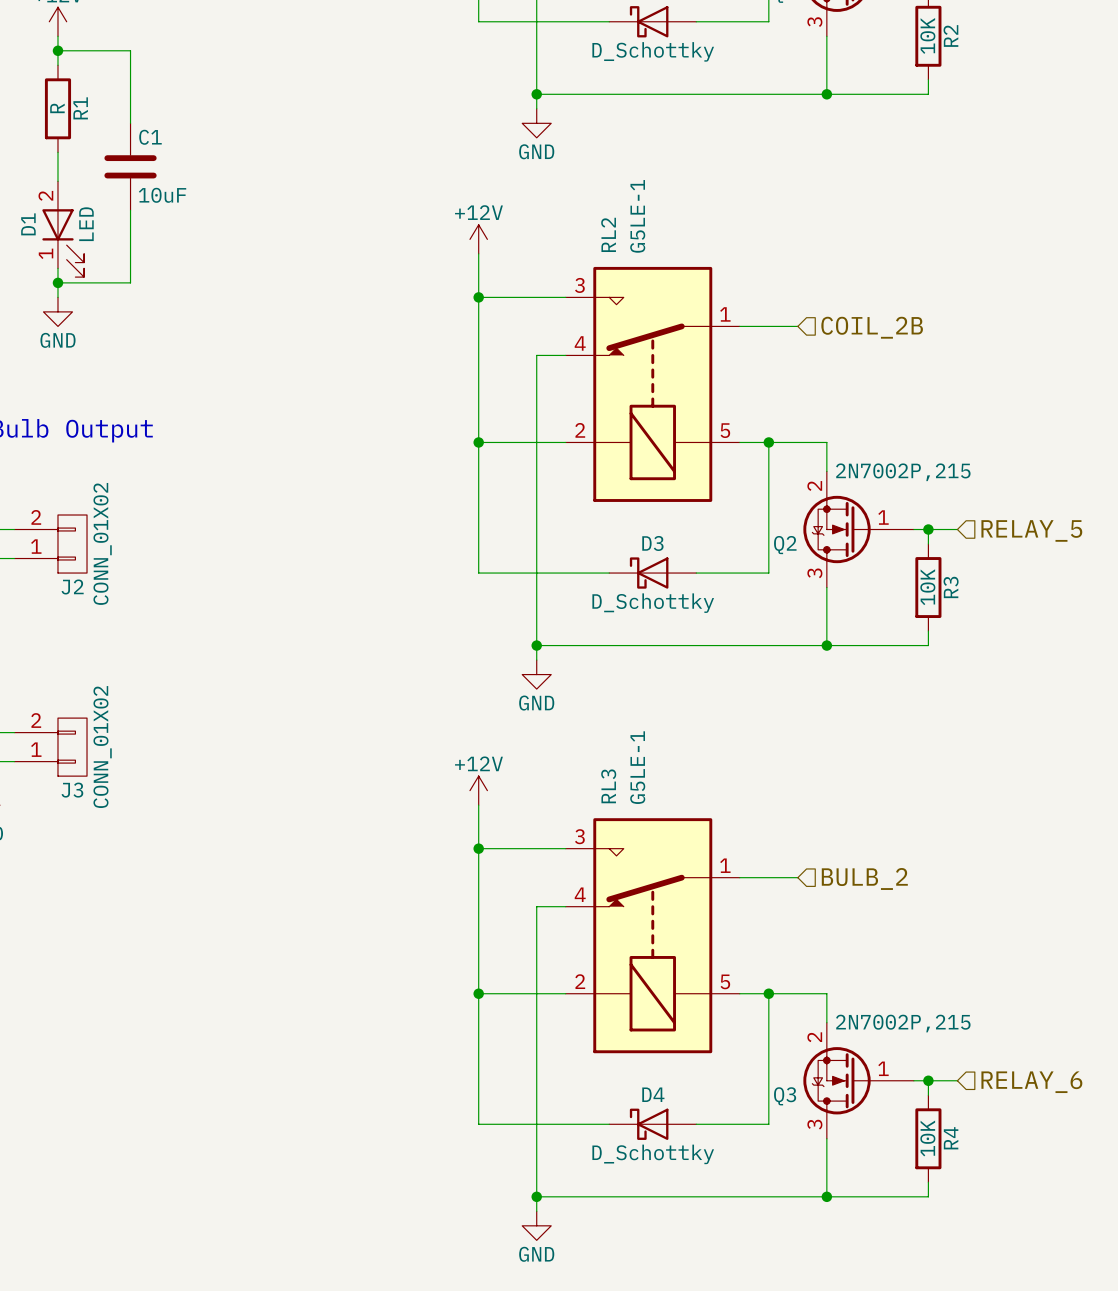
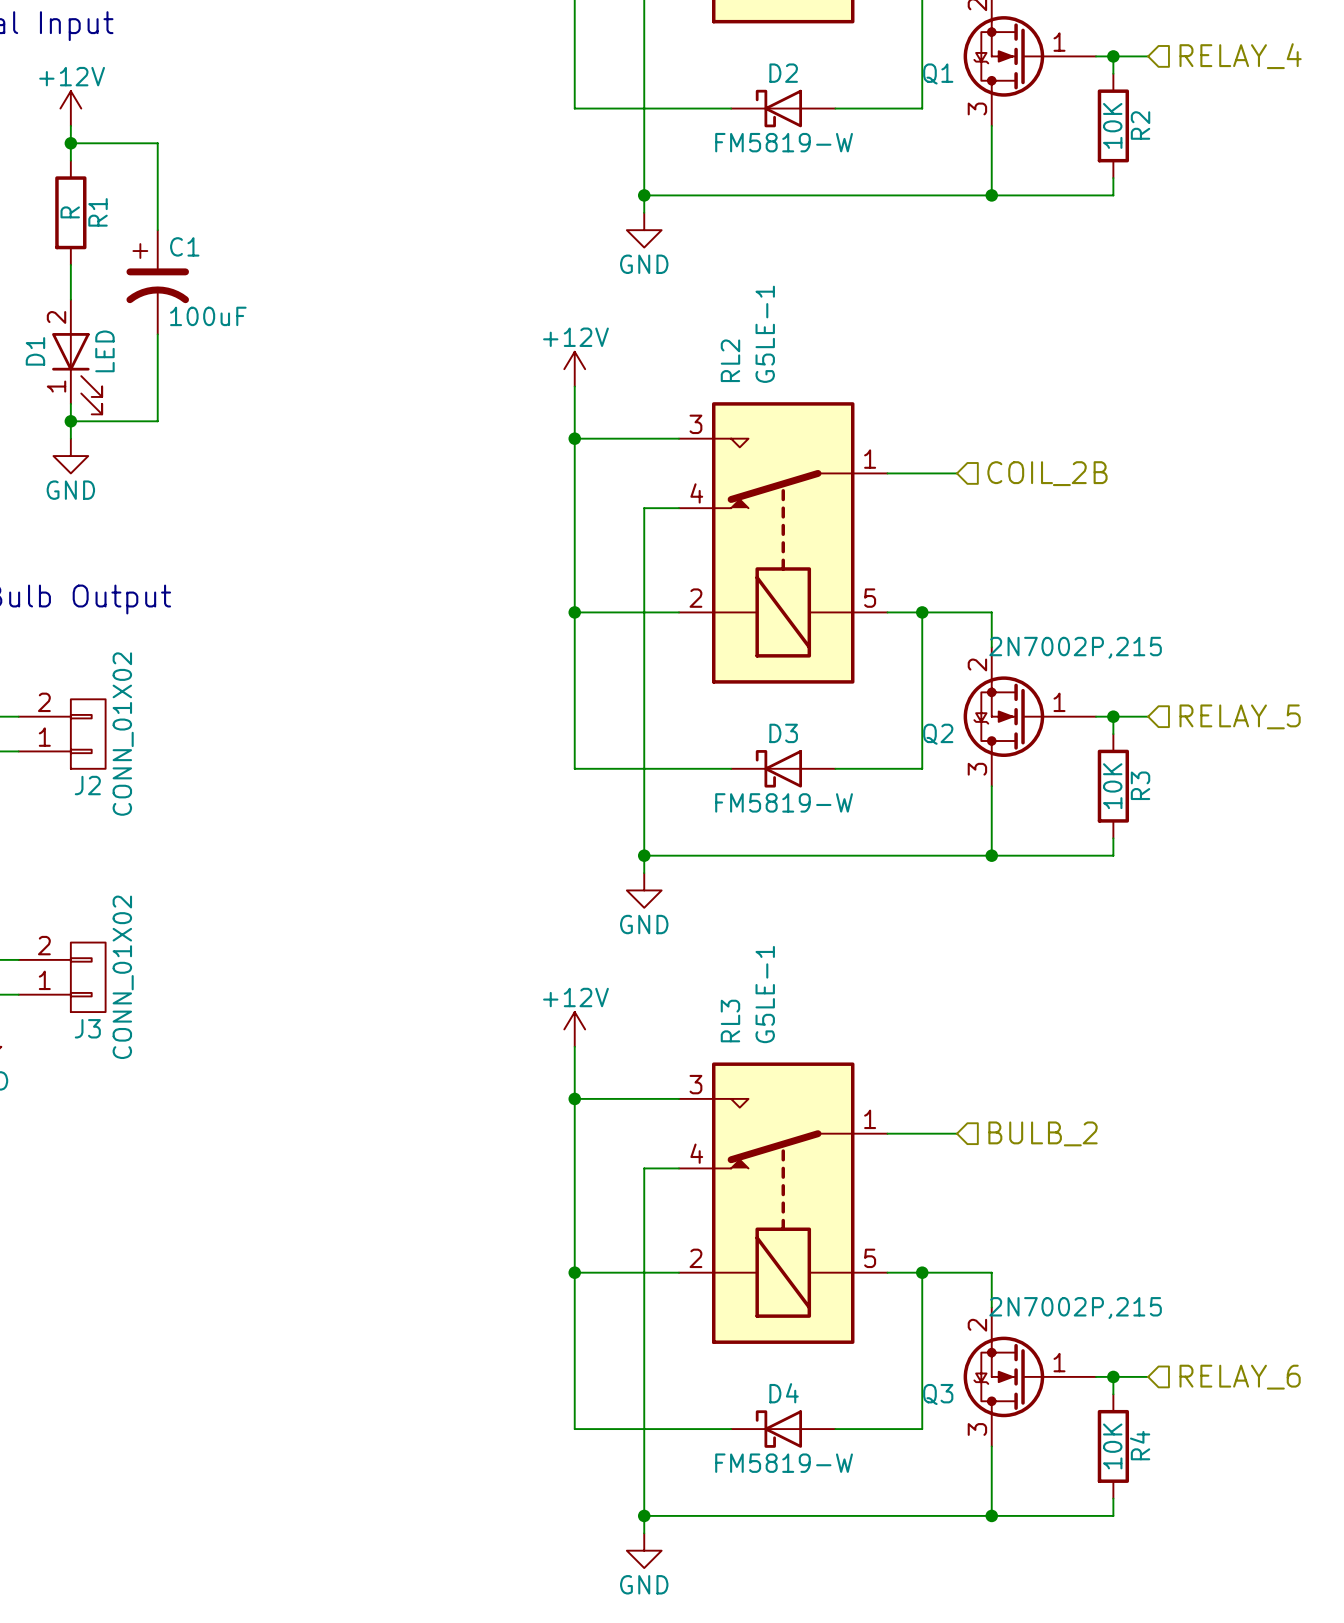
D2 value: D_Schottky (653, 51) -> FM5819-W (784, 142)
C1 symbol: [104, 123, 157, 211] -> [126, 230, 190, 335]
C1 value: 10uF (162, 195) -> 100uF (208, 316)
D3 value: D_Schottky (653, 603) -> FM5819-W (784, 802)
D4 value: D_Schottky (653, 1154) -> FM5819-W (784, 1463)

